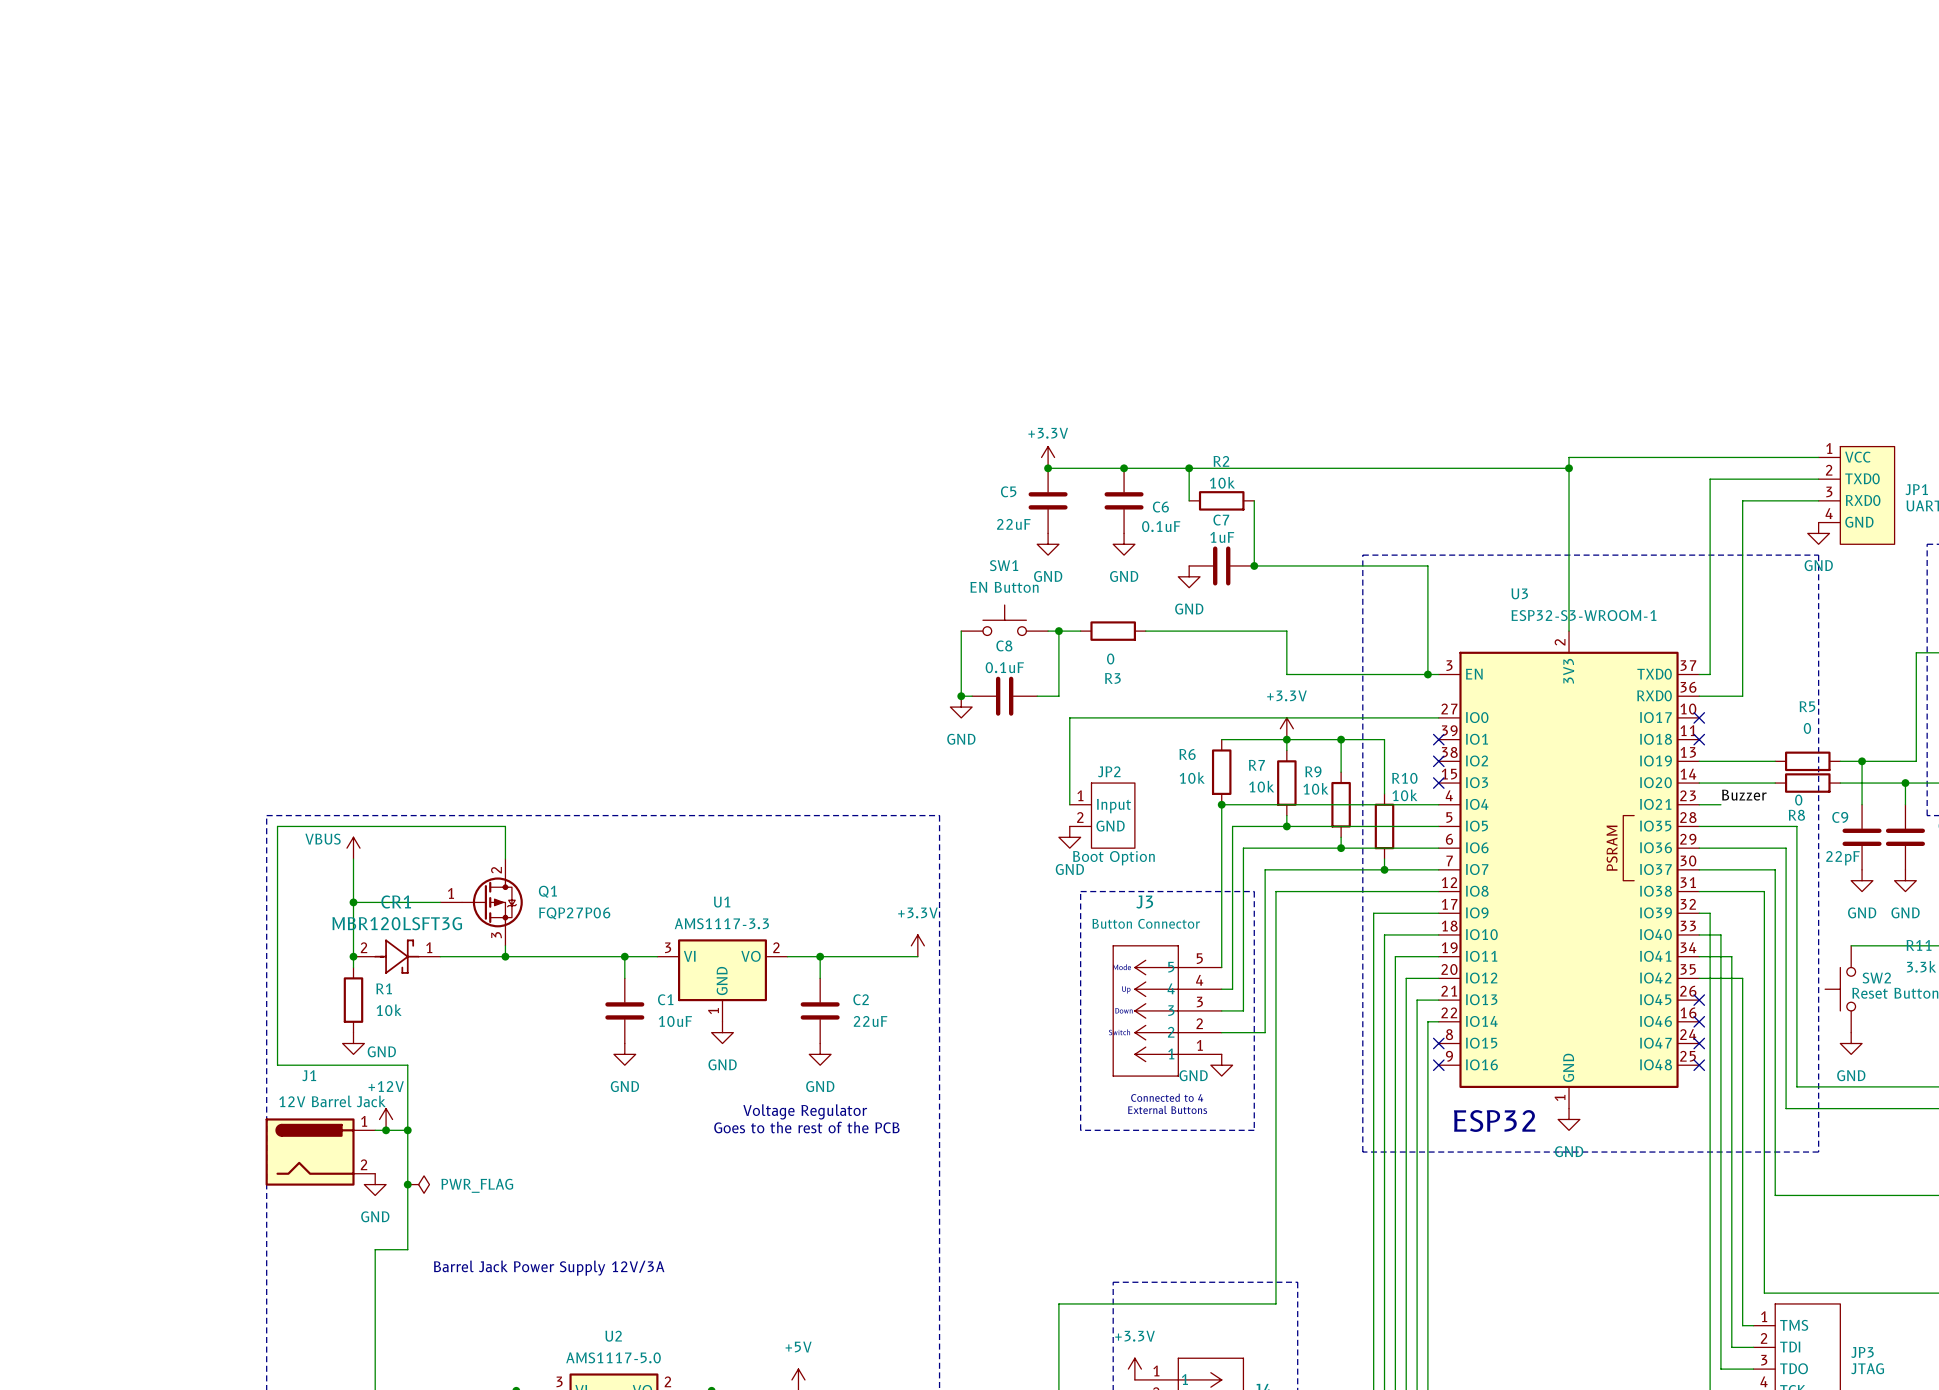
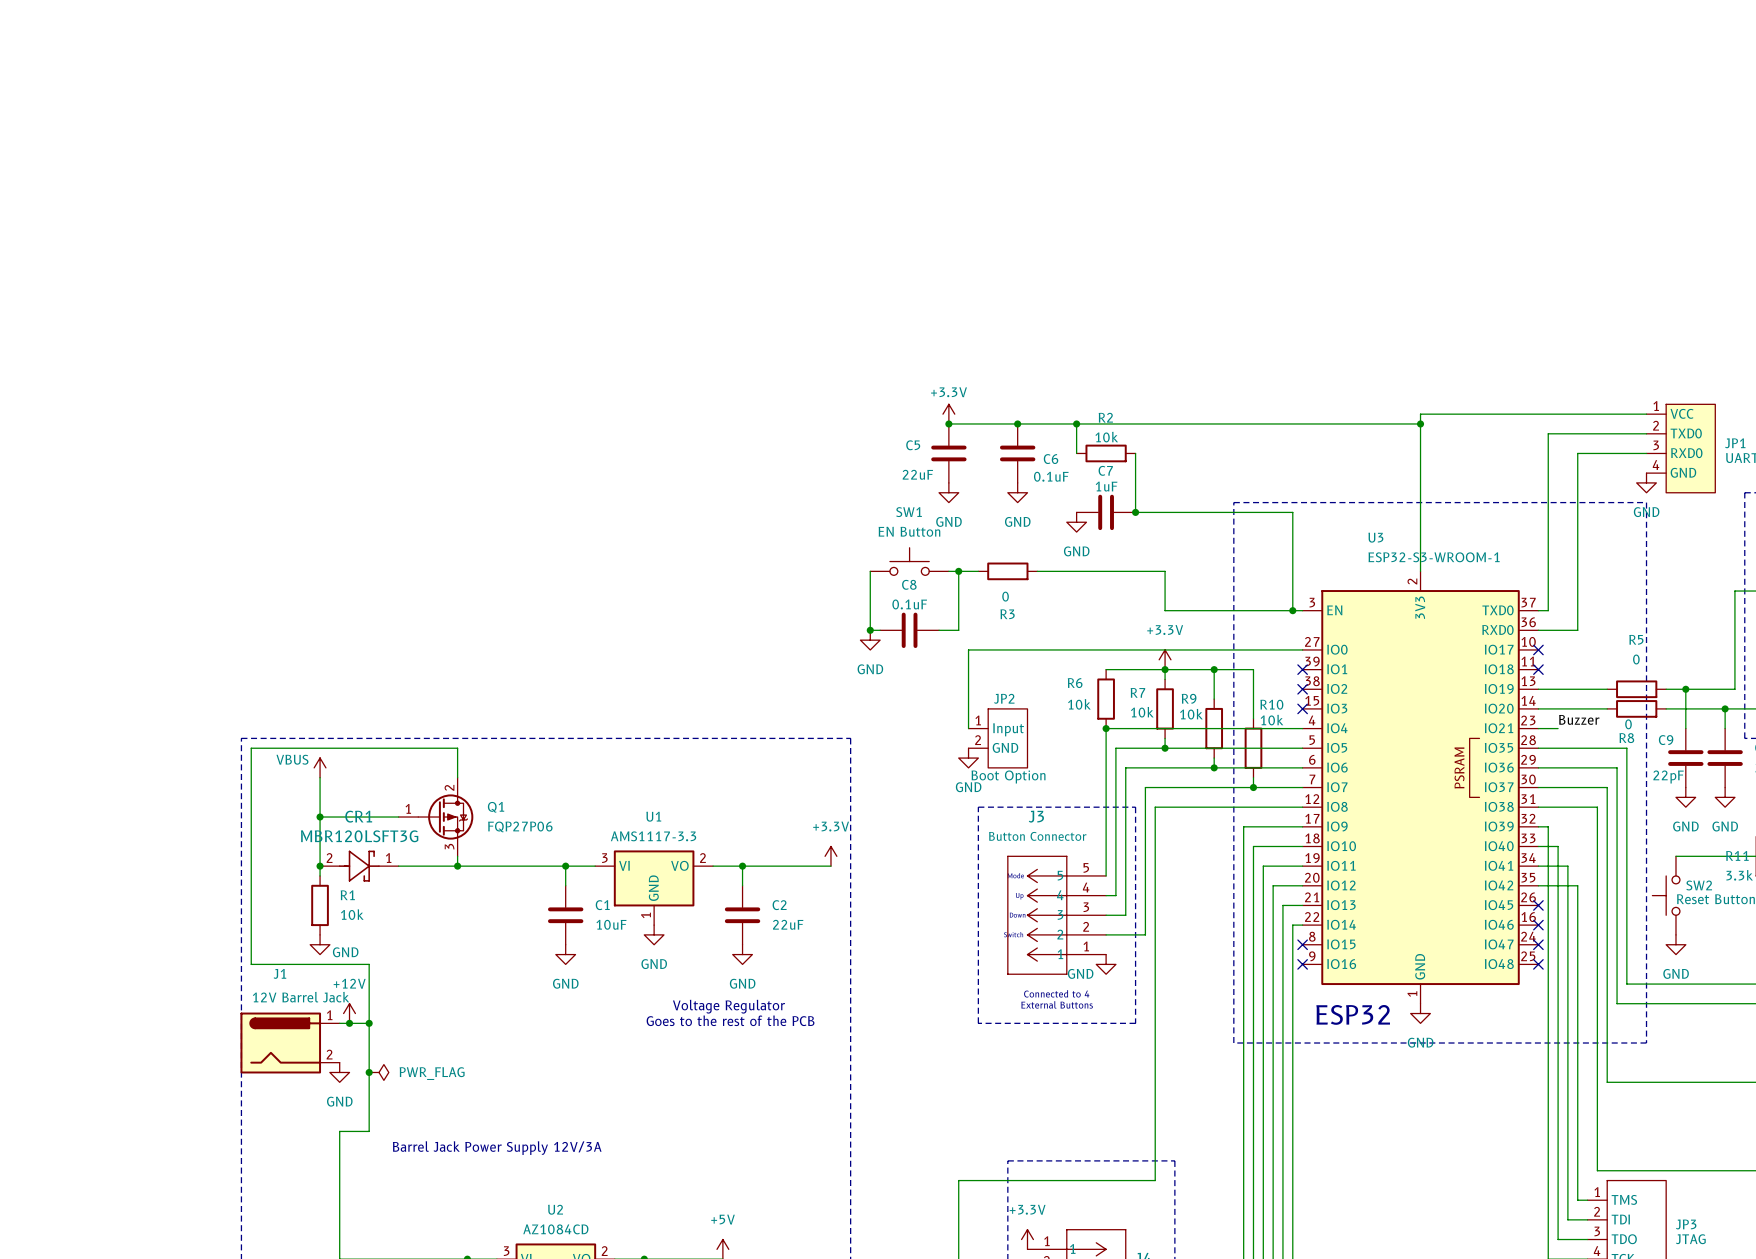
U2 value: AMS1117-5.0 (613, 1357) -> AZ1084CD (555, 1229)

